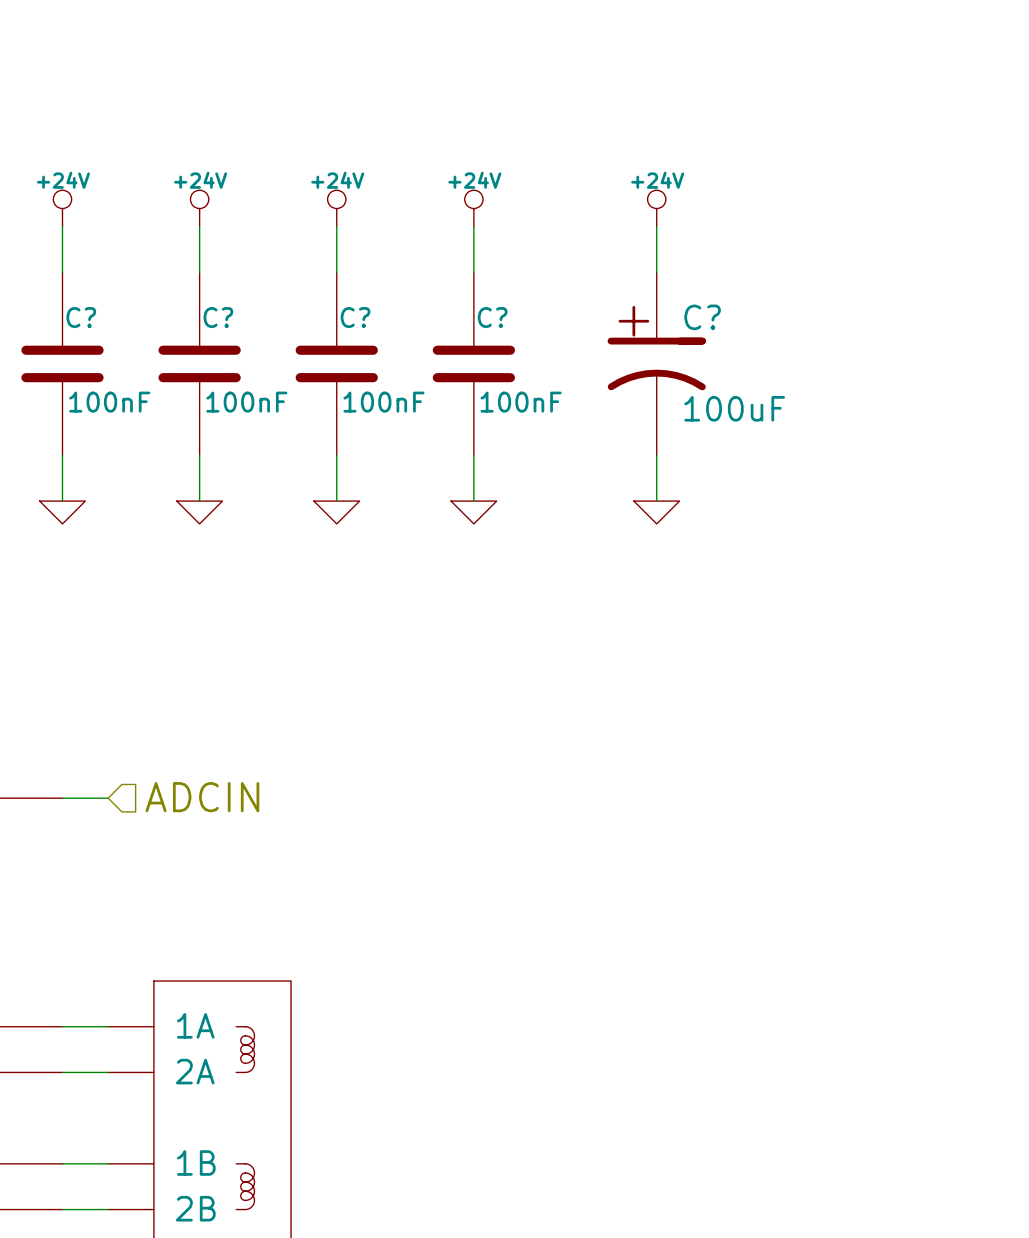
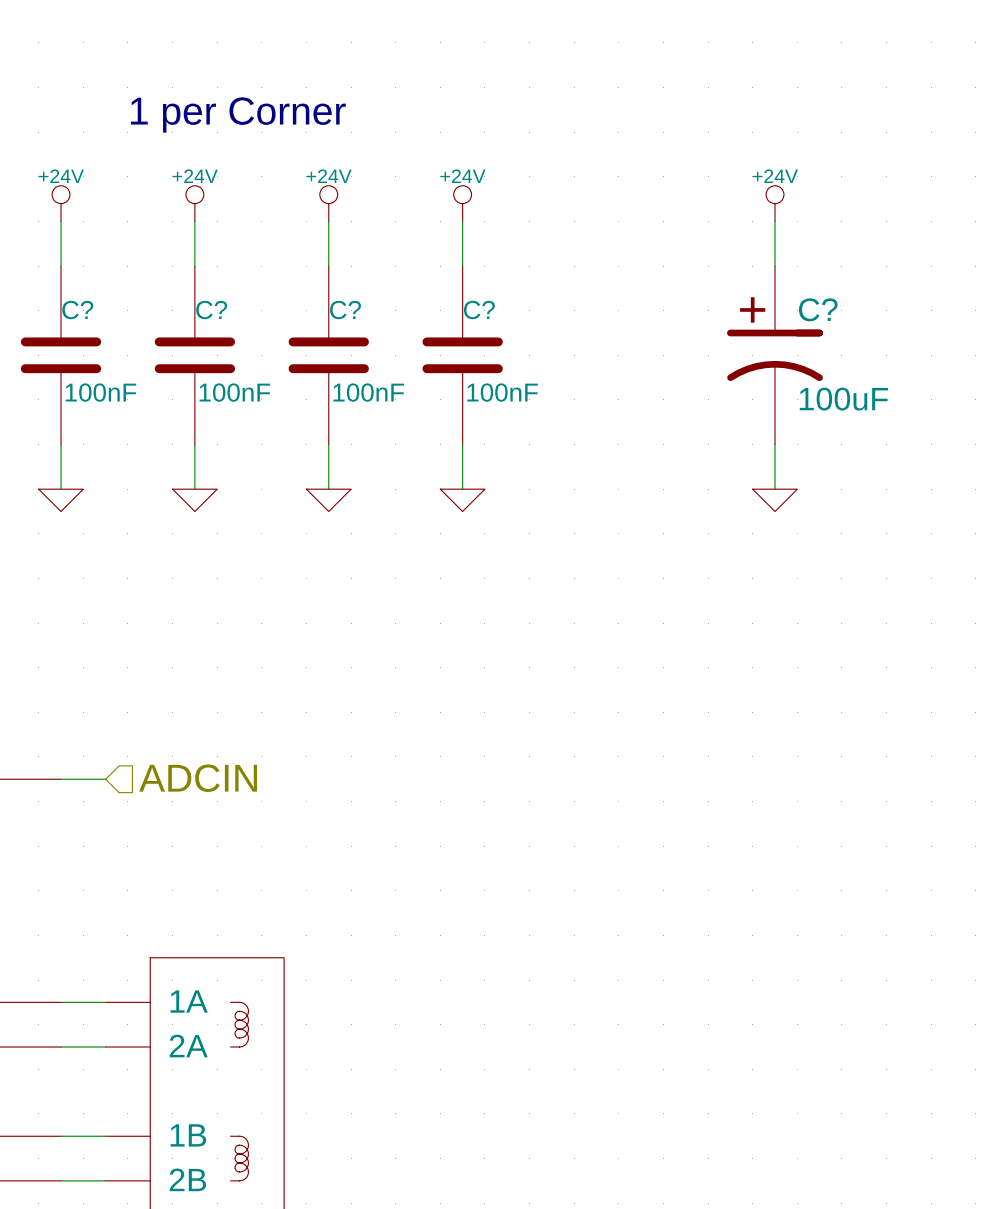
text: none -> 1 per Corner (238, 114)
power symbol position: +24V (656, 208) -> +24V (775, 203)
wire: (656, 226) (656, 272) -> (775, 221) (775, 266)
C? position: (656, 363) -> (775, 355)
wire: (656, 455) (656, 501) -> (775, 444) (775, 489)
power symbol position: (656, 512) -> (775, 500)

